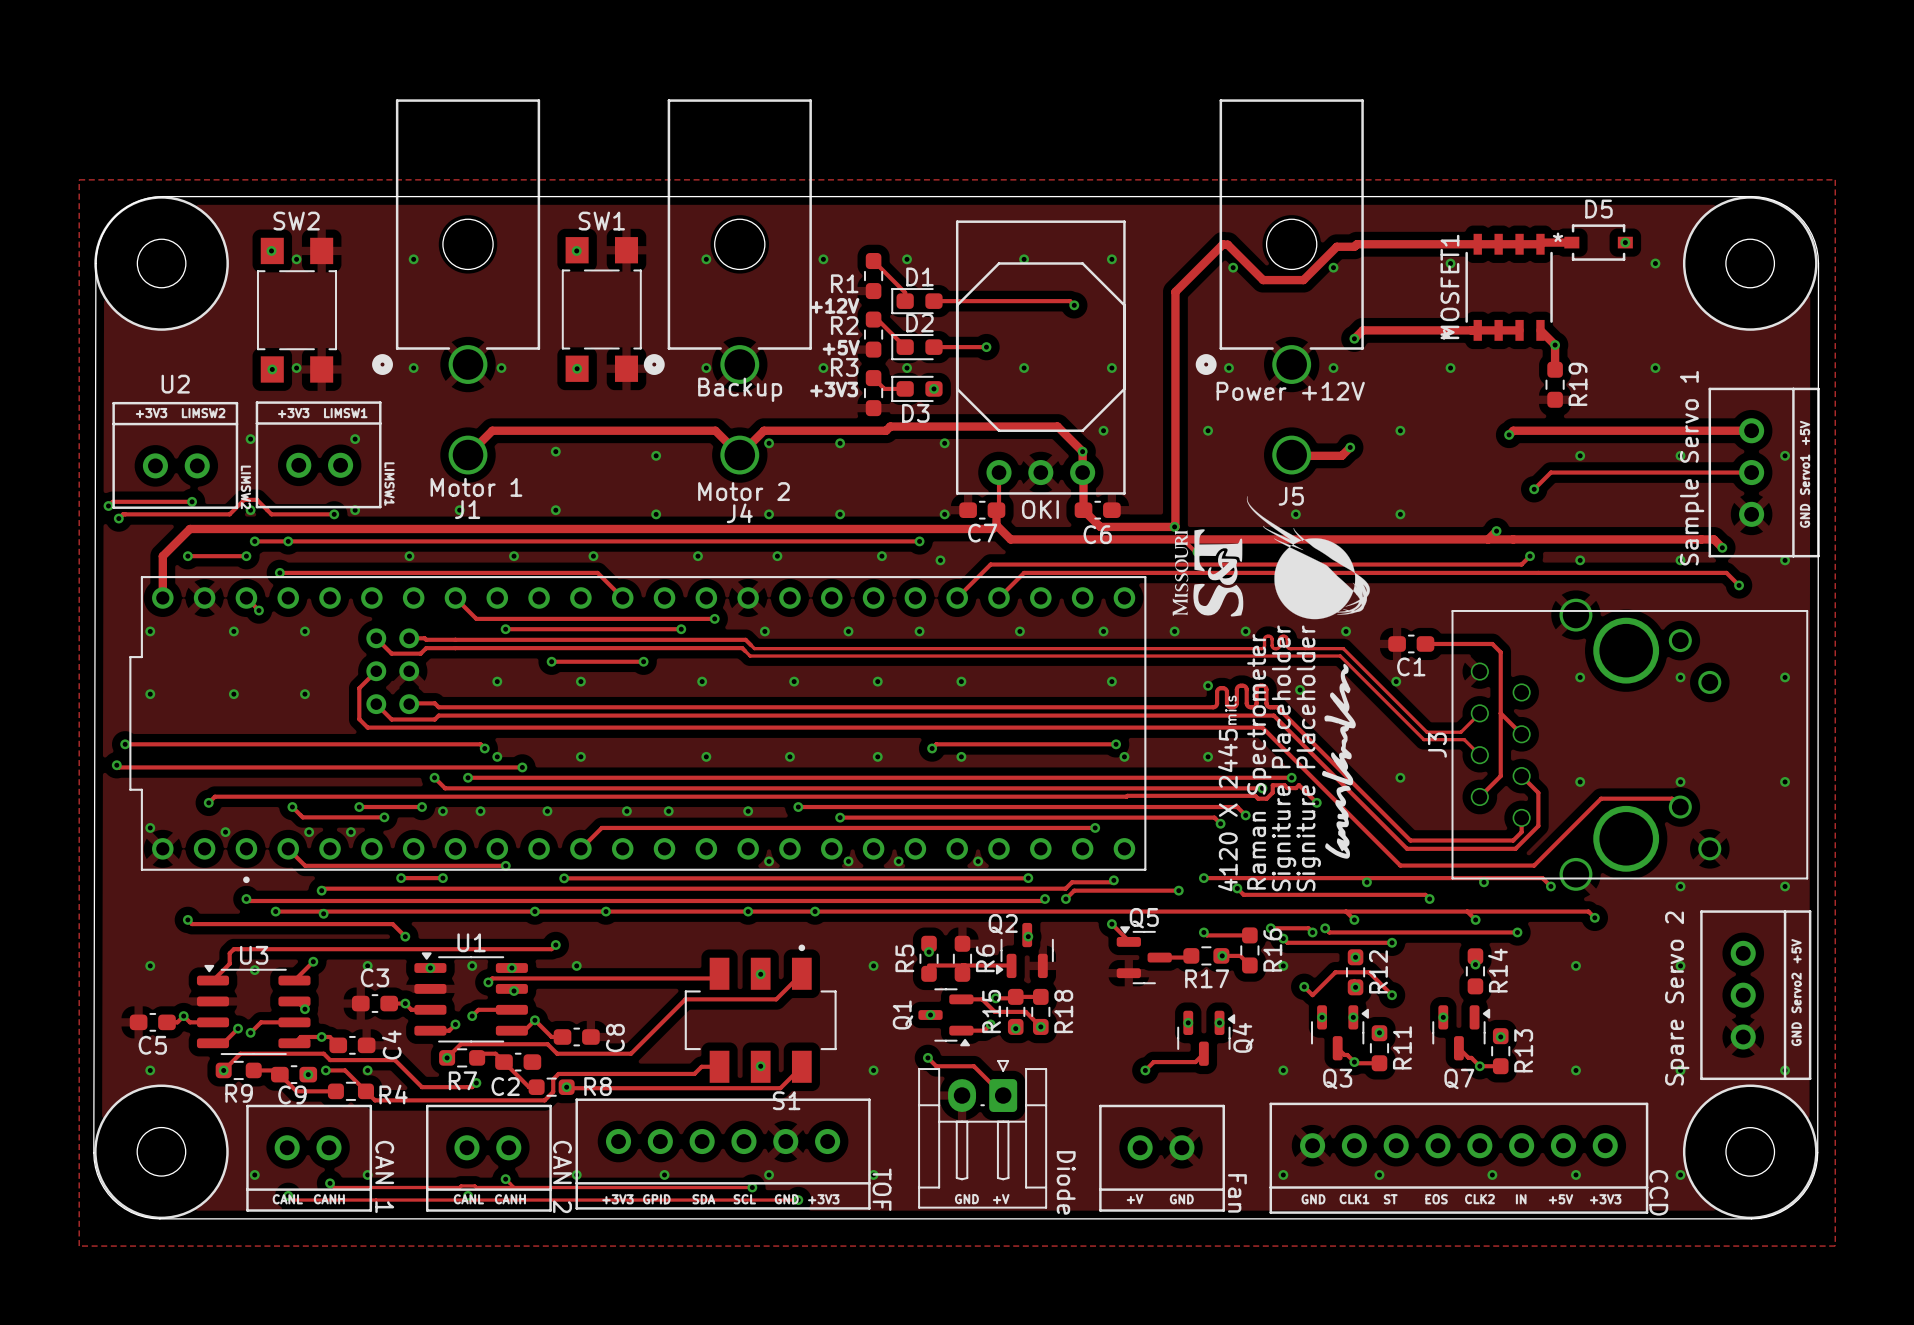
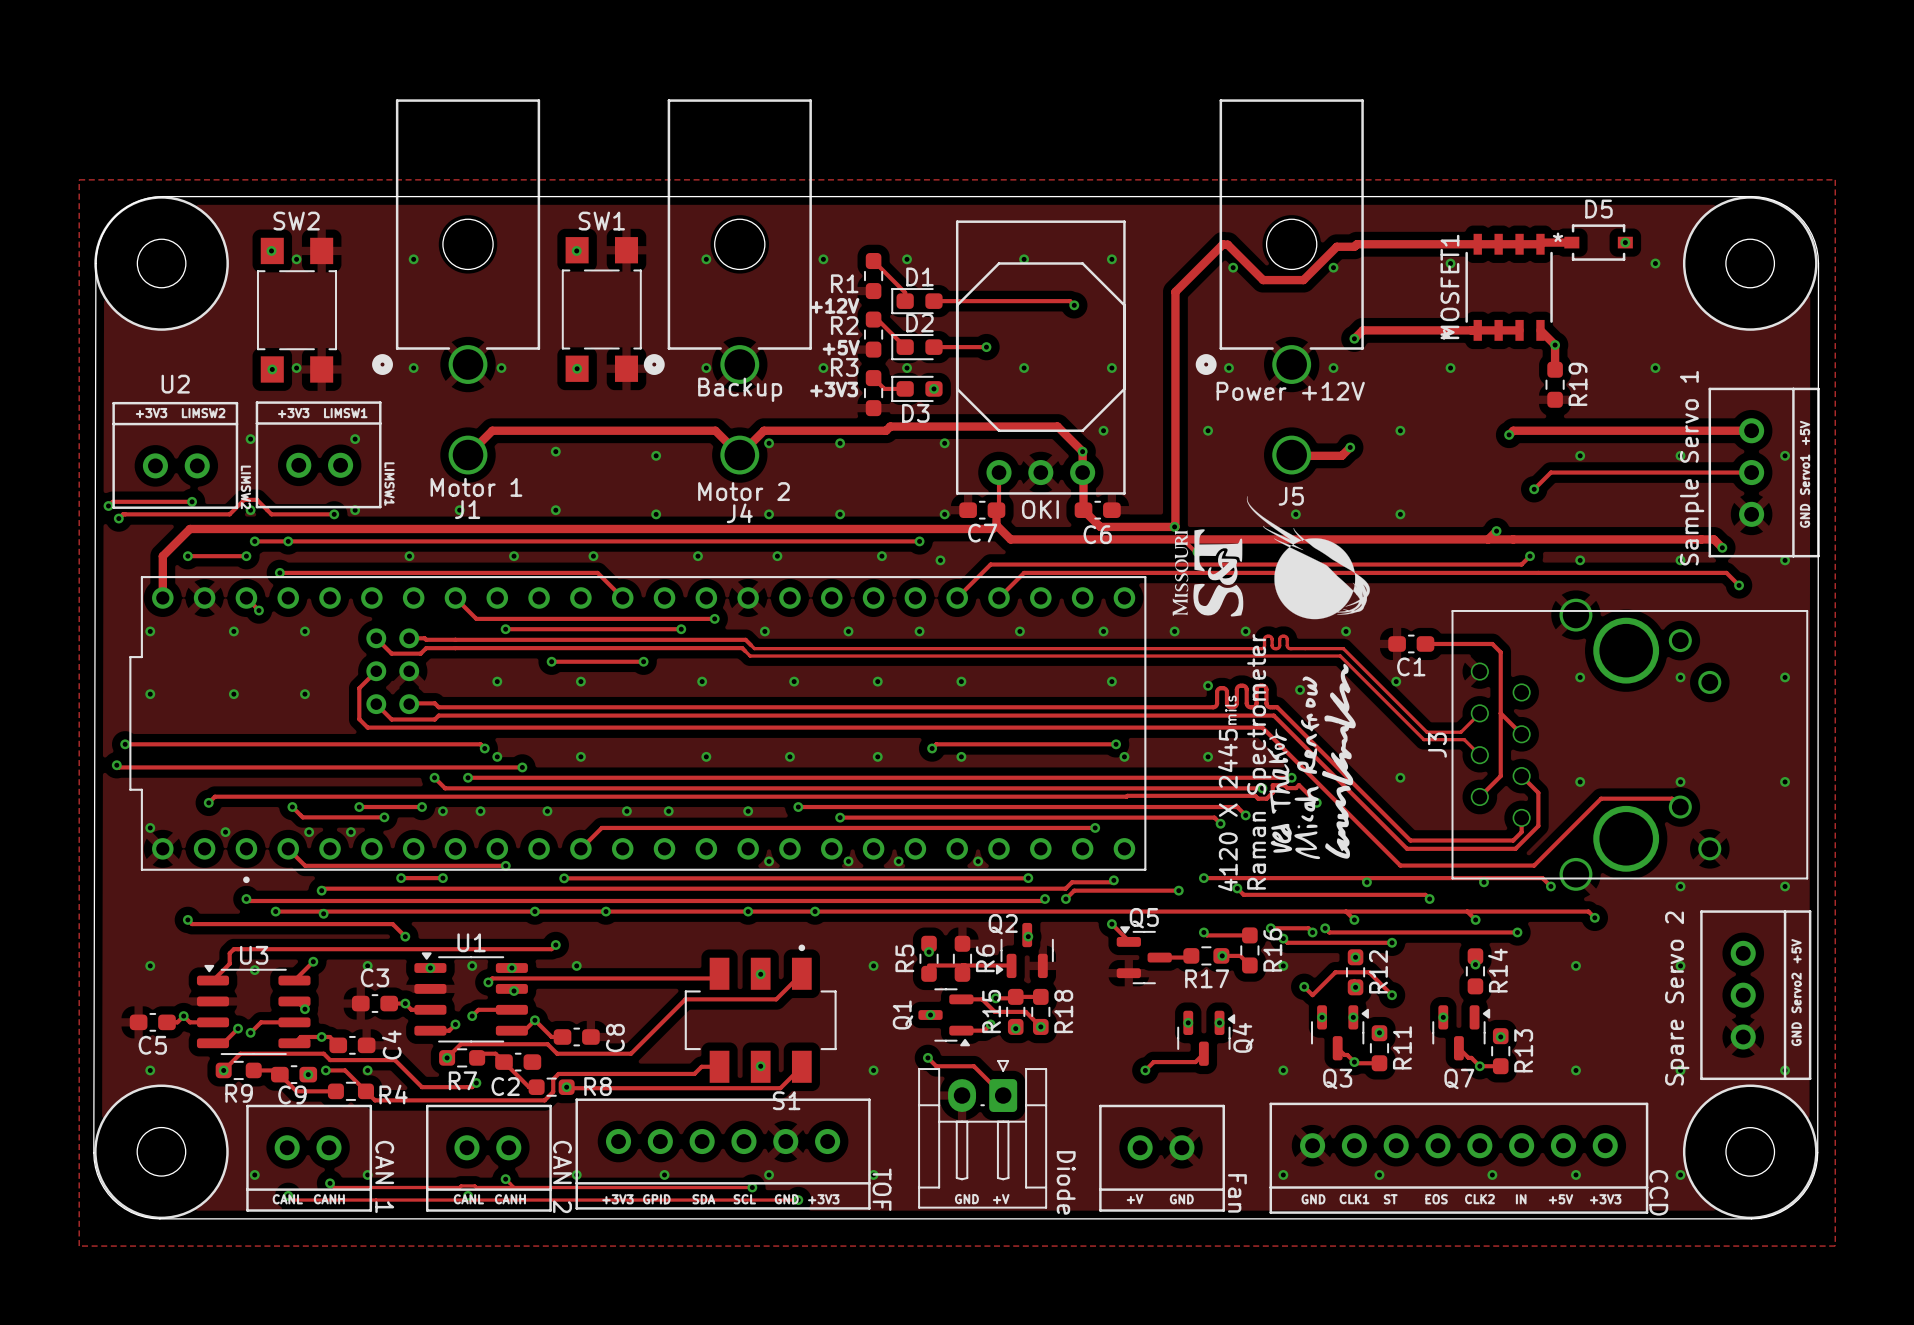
drawing: none -> [1267, 676, 1321, 860]
text: Signiture Placeholder (1284, 758) -> none
text: Signiture Placeholder (1308, 758) -> none

